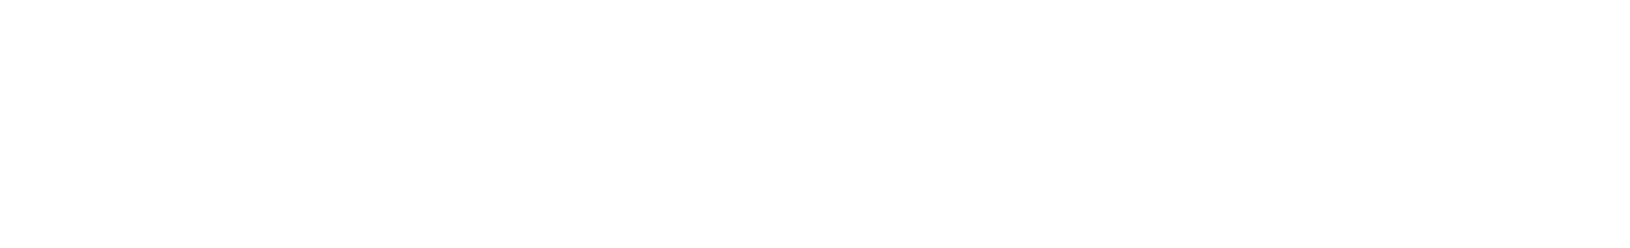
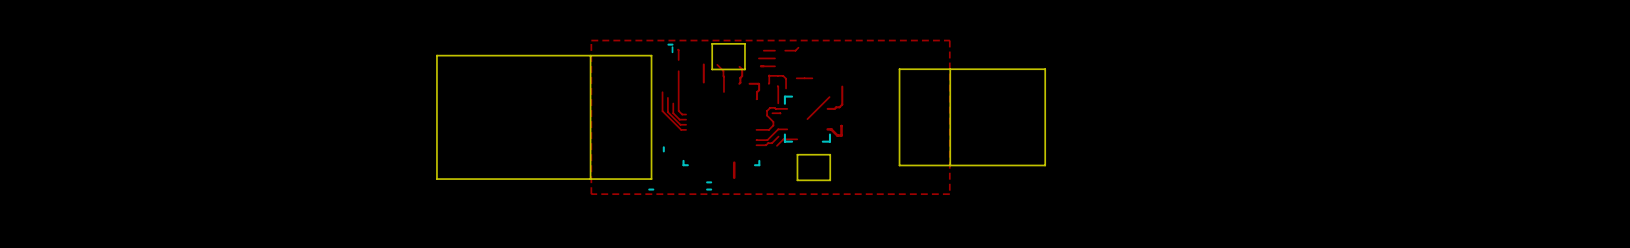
zone outline: none -> (591, 40) (949, 40) (949, 194) (591, 194) (591, 40)
board edge: none -> (712, 43) (712, 69) (744, 69) (744, 43) (712, 43)
line: none -> (668, 44) (672, 44)
line: none -> (672, 47) (672, 52)
track: none -> (798, 47) (795, 50) (785, 50)
track: none -> (678, 49) (678, 59)
track: none -> (763, 50) (774, 50)
board edge: none -> (436, 55) (651, 55) (651, 179) (436, 179) (436, 55)
board edge: none -> (590, 55) (590, 179)
track: none -> (758, 58) (774, 58)
track: none -> (703, 64) (703, 82)
track: none -> (717, 64) (723, 71) (723, 91)
track: none -> (739, 66) (742, 69) (742, 76) (739, 83)
track: none -> (760, 66) (774, 66)
board edge: none -> (899, 69) (1045, 69) (1045, 165) (899, 165) (899, 69)
board edge: none -> (950, 69) (950, 165)
track: none -> (678, 71) (678, 110) (682, 114) (686, 114)
track: none -> (769, 75) (768, 83)
track: none -> (769, 75) (783, 75) (786, 78) (786, 88)
track: none -> (796, 78) (812, 78)
track: none -> (749, 83) (758, 83)
track: none -> (759, 83) (756, 99)
track: none -> (777, 86) (778, 103)
track: none -> (842, 86) (842, 104) (834, 108) (827, 108)
track: none -> (662, 92) (662, 111) (681, 129) (686, 129)
line: none -> (792, 96) (784, 96) (784, 103)
track: none -> (667, 97) (667, 112) (680, 124) (686, 124)
track: none -> (829, 97) (807, 119)
track: none -> (673, 103) (673, 113) (679, 119) (686, 119)
track: none -> (787, 108) (770, 107) (767, 111) (767, 115) (773, 121) (773, 125) (768, 129) (756, 129)
track: none -> (772, 113) (780, 113)
track: none -> (841, 126) (841, 135) (837, 135) (831, 129) (827, 129)
track: none -> (787, 129) (778, 129) (767, 140) (756, 140)
line: none -> (784, 134) (784, 141) (792, 141)
line: none -> (829, 134) (829, 141) (822, 141)
track: none -> (778, 136) (771, 143) (756, 145)
track: none -> (797, 139) (783, 139) (776, 145)
line: none -> (663, 147) (663, 151)
board edge: none -> (797, 154) (830, 154) (830, 180) (797, 180) (797, 154)
line: none -> (683, 160) (683, 165) (687, 165)
line: none -> (759, 160) (759, 165) (754, 165)
track: none -> (734, 162) (734, 177)
line: none -> (707, 182) (711, 182)
line: none -> (649, 189) (653, 189)
line: none -> (707, 189) (711, 189)

